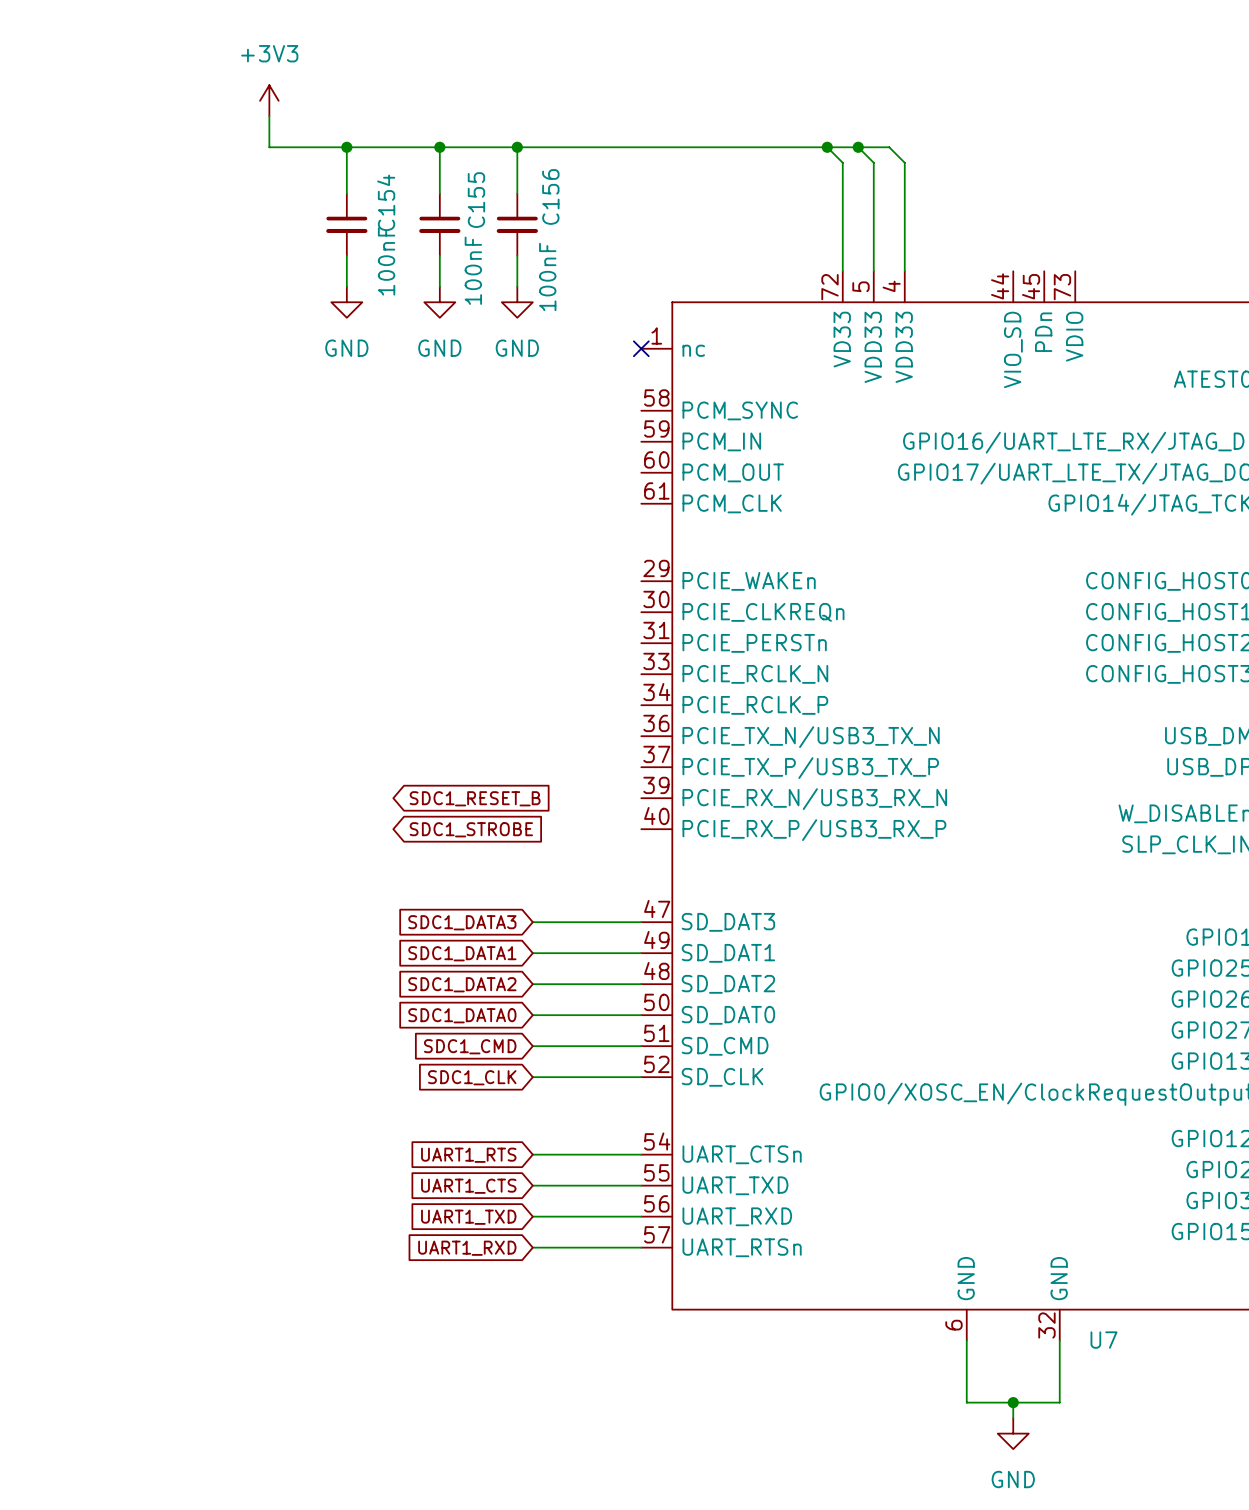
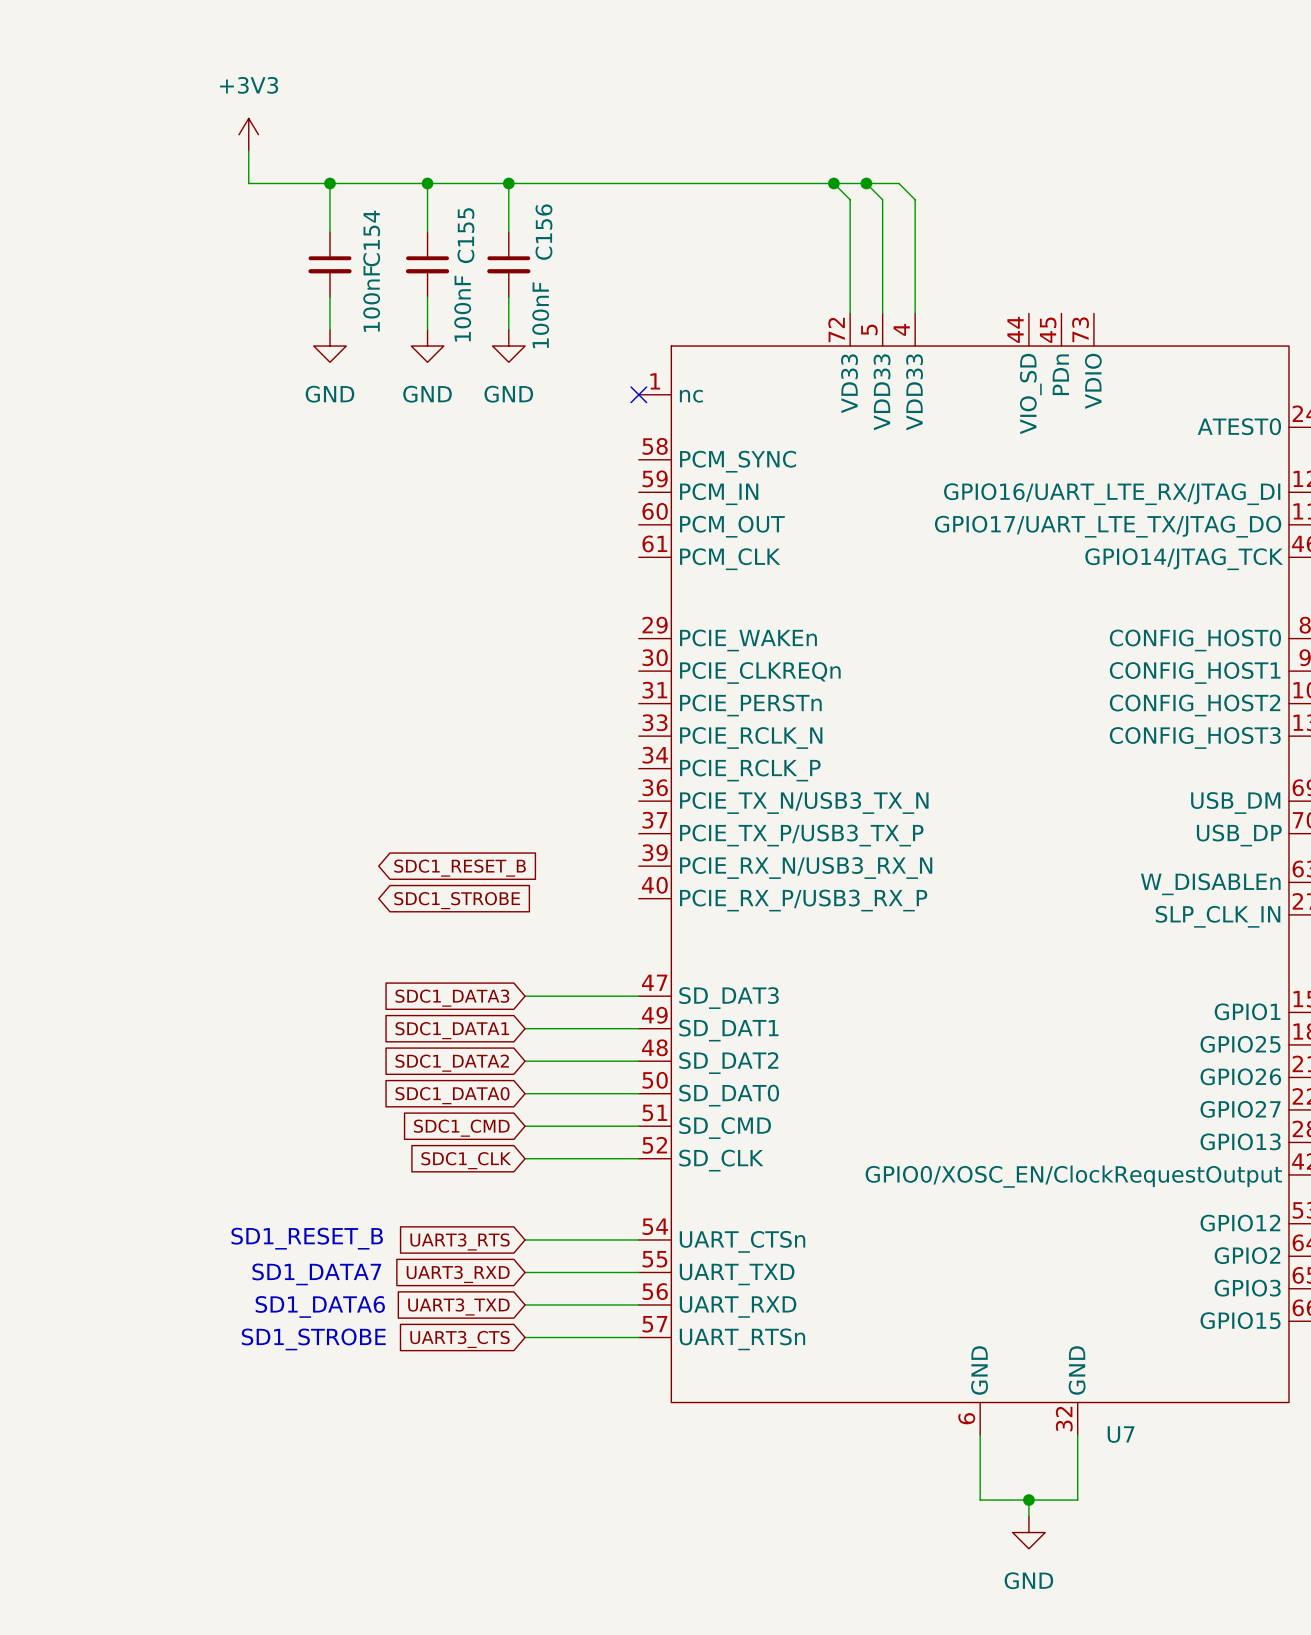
text: none -> SD1_RESET_B (307, 1238)
global label: UART1_RTS (468, 1155) -> UART3_RTS (460, 1241)
text: none -> SD1_DATA7 (316, 1274)
global label: UART1_CTS (468, 1186) -> UART3_RXD (458, 1274)
text: none -> SD1_DATA6 (320, 1306)
global label: UART1_TXD (468, 1217) -> UART3_TXD (458, 1306)
text: none -> SD1_STROBE (313, 1339)
global label: UART1_RXD (467, 1248) -> UART3_CTS (460, 1339)

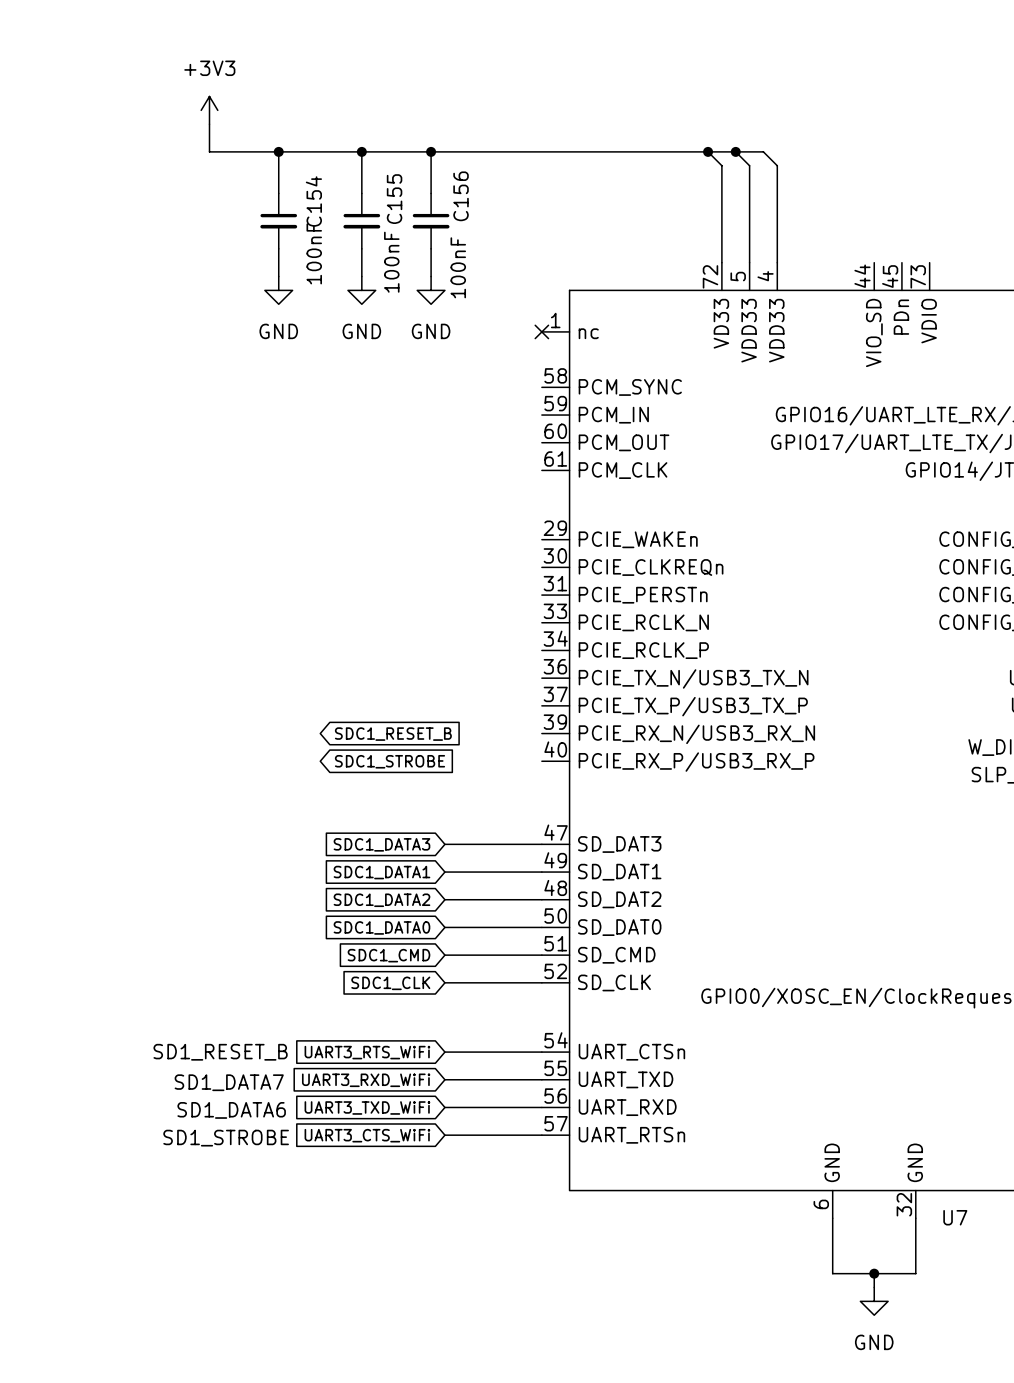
text position: SD1_RESET_B (307, 1238) -> SD1_RESET_B (220, 1052)
global label: UART3_RTS (460, 1241) -> UART3_RTS_WiFi (367, 1052)
text position: SD1_DATA7 (316, 1274) -> SD1_DATA7 (229, 1082)
global label: UART3_RXD (458, 1274) -> UART3_RXD_WiFi (366, 1080)
text position: SD1_DATA6 (320, 1306) -> SD1_DATA6 (231, 1110)
global label: UART3_TXD (458, 1306) -> UART3_TXD_WiFi (367, 1107)
text position: SD1_STROBE (313, 1339) -> SD1_STROBE (226, 1138)
global label: UART3_CTS (460, 1339) -> UART3_CTS_WiFi (367, 1135)

